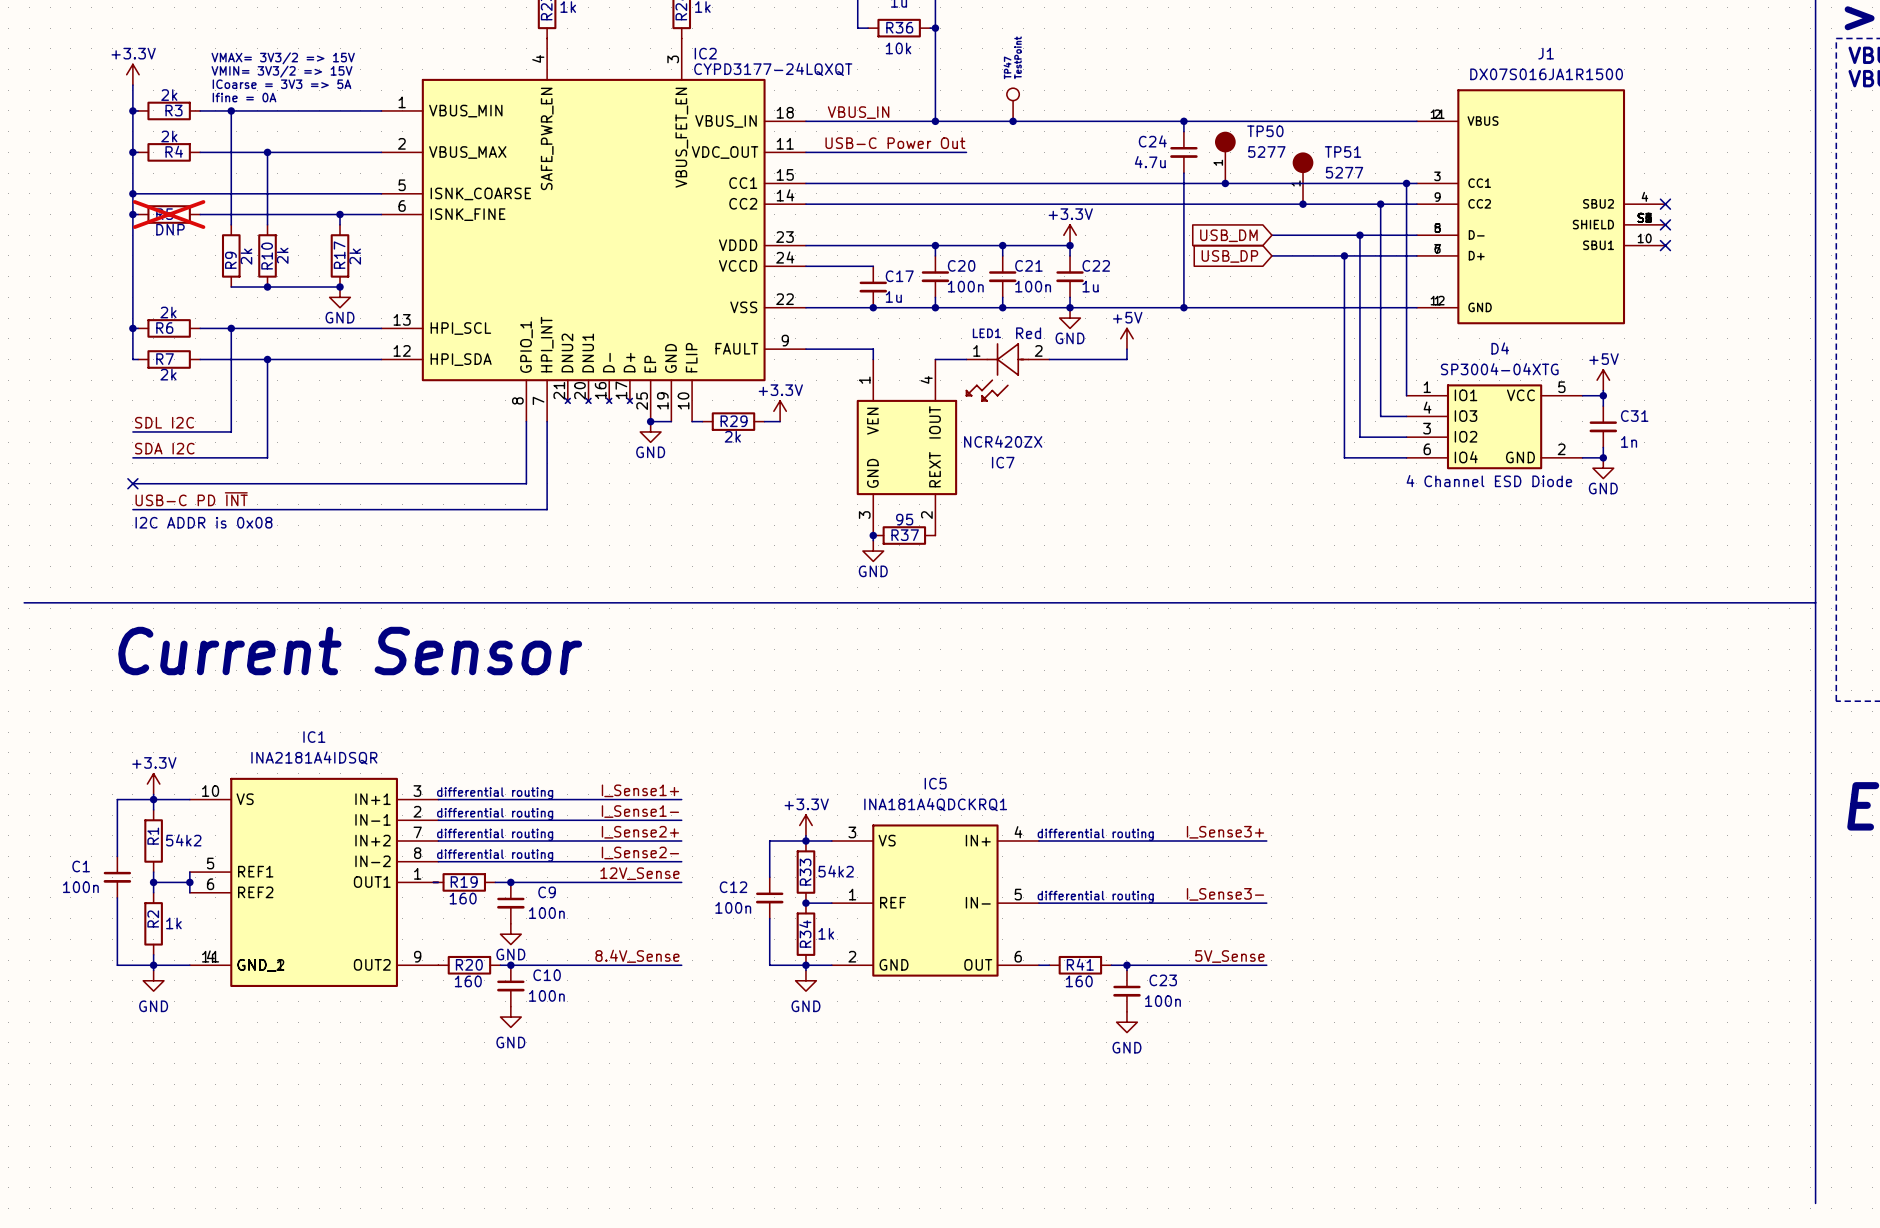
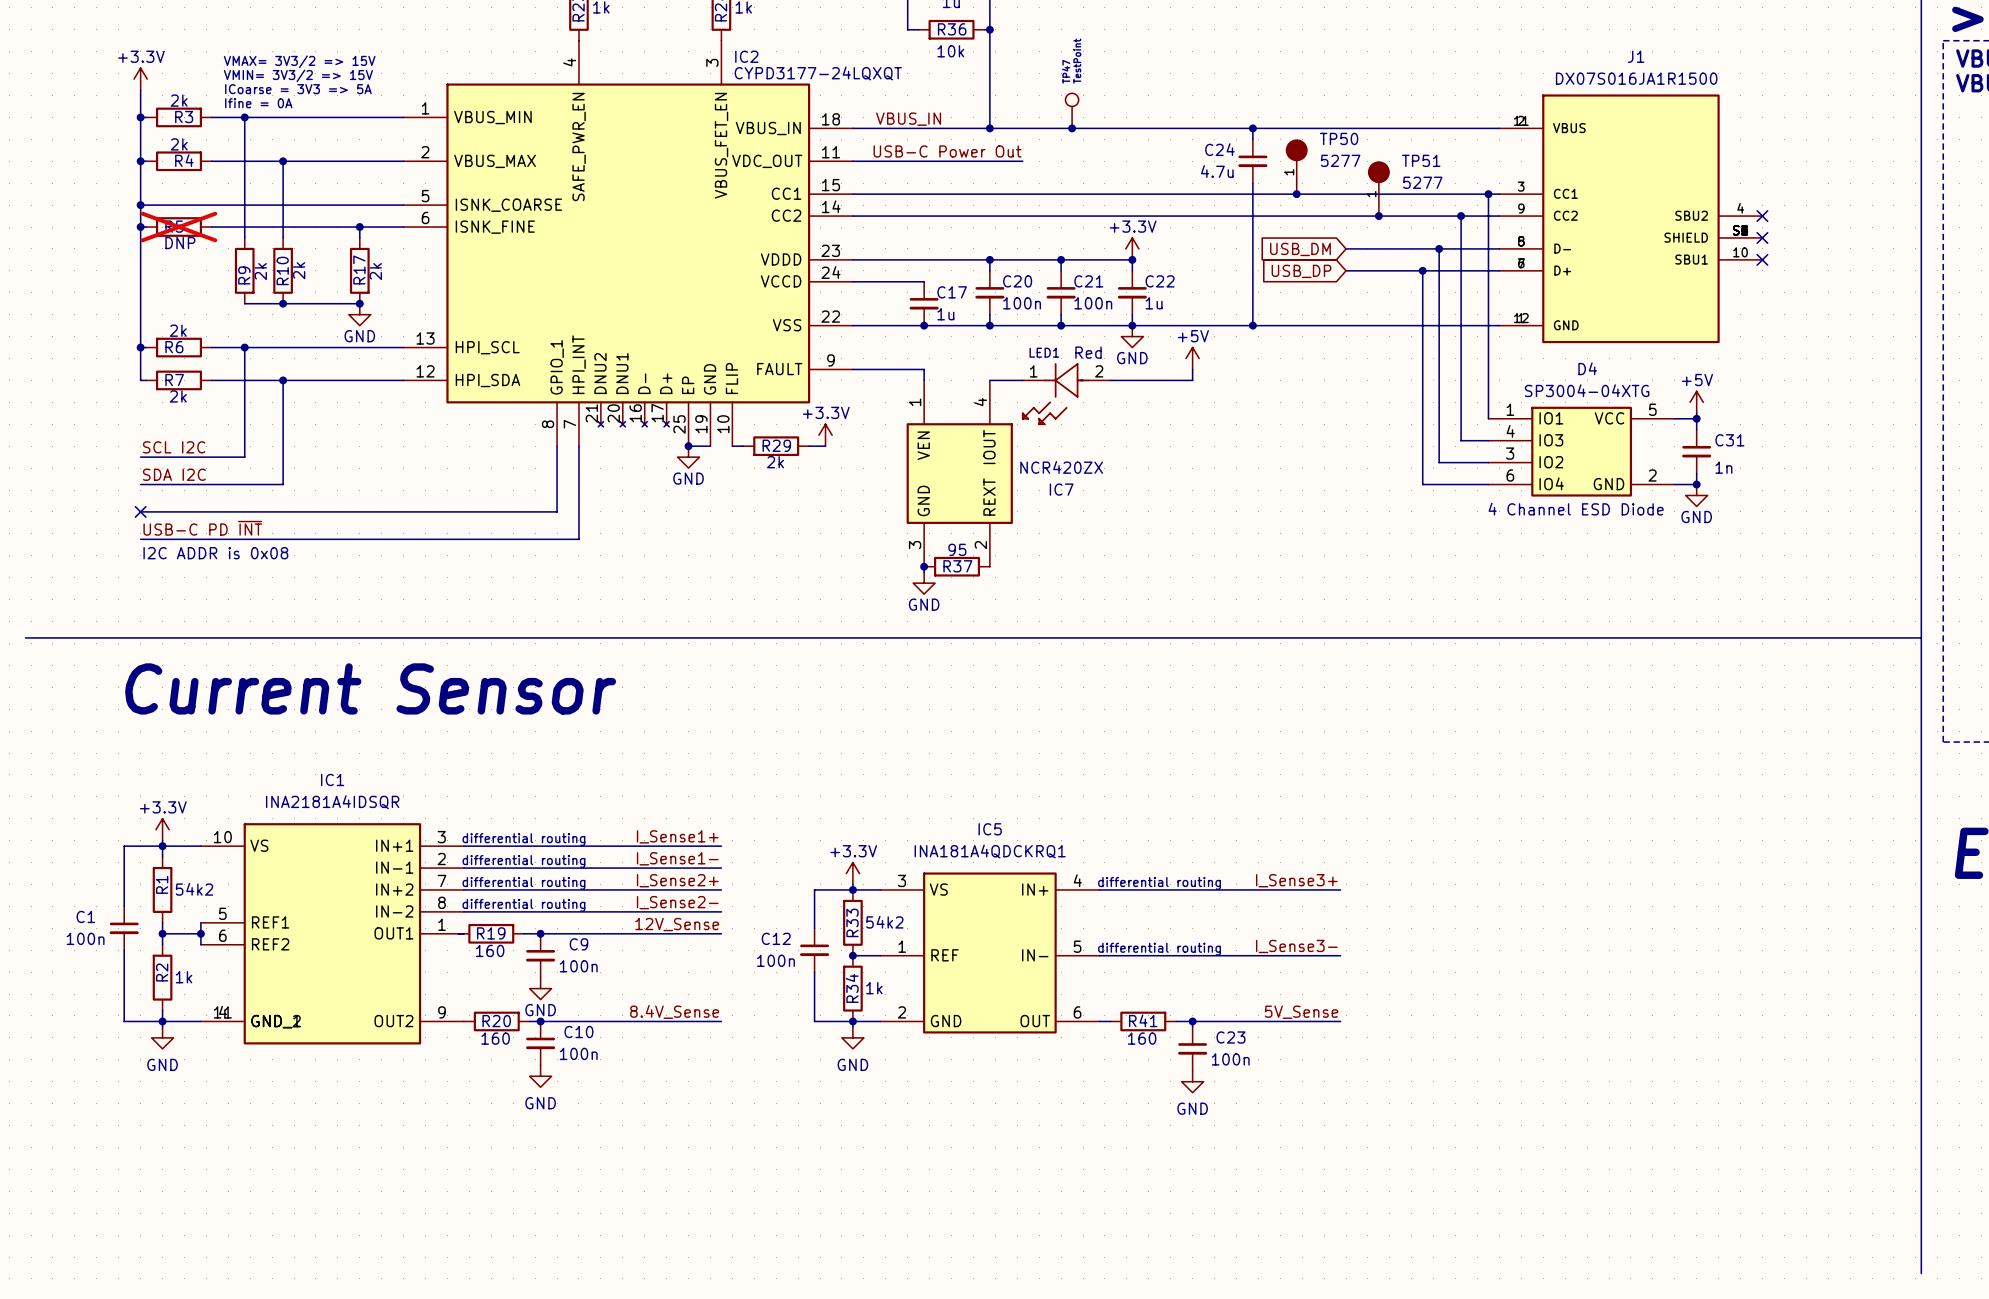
label: SDL I2C (164, 422) -> SCL I2C (174, 447)

